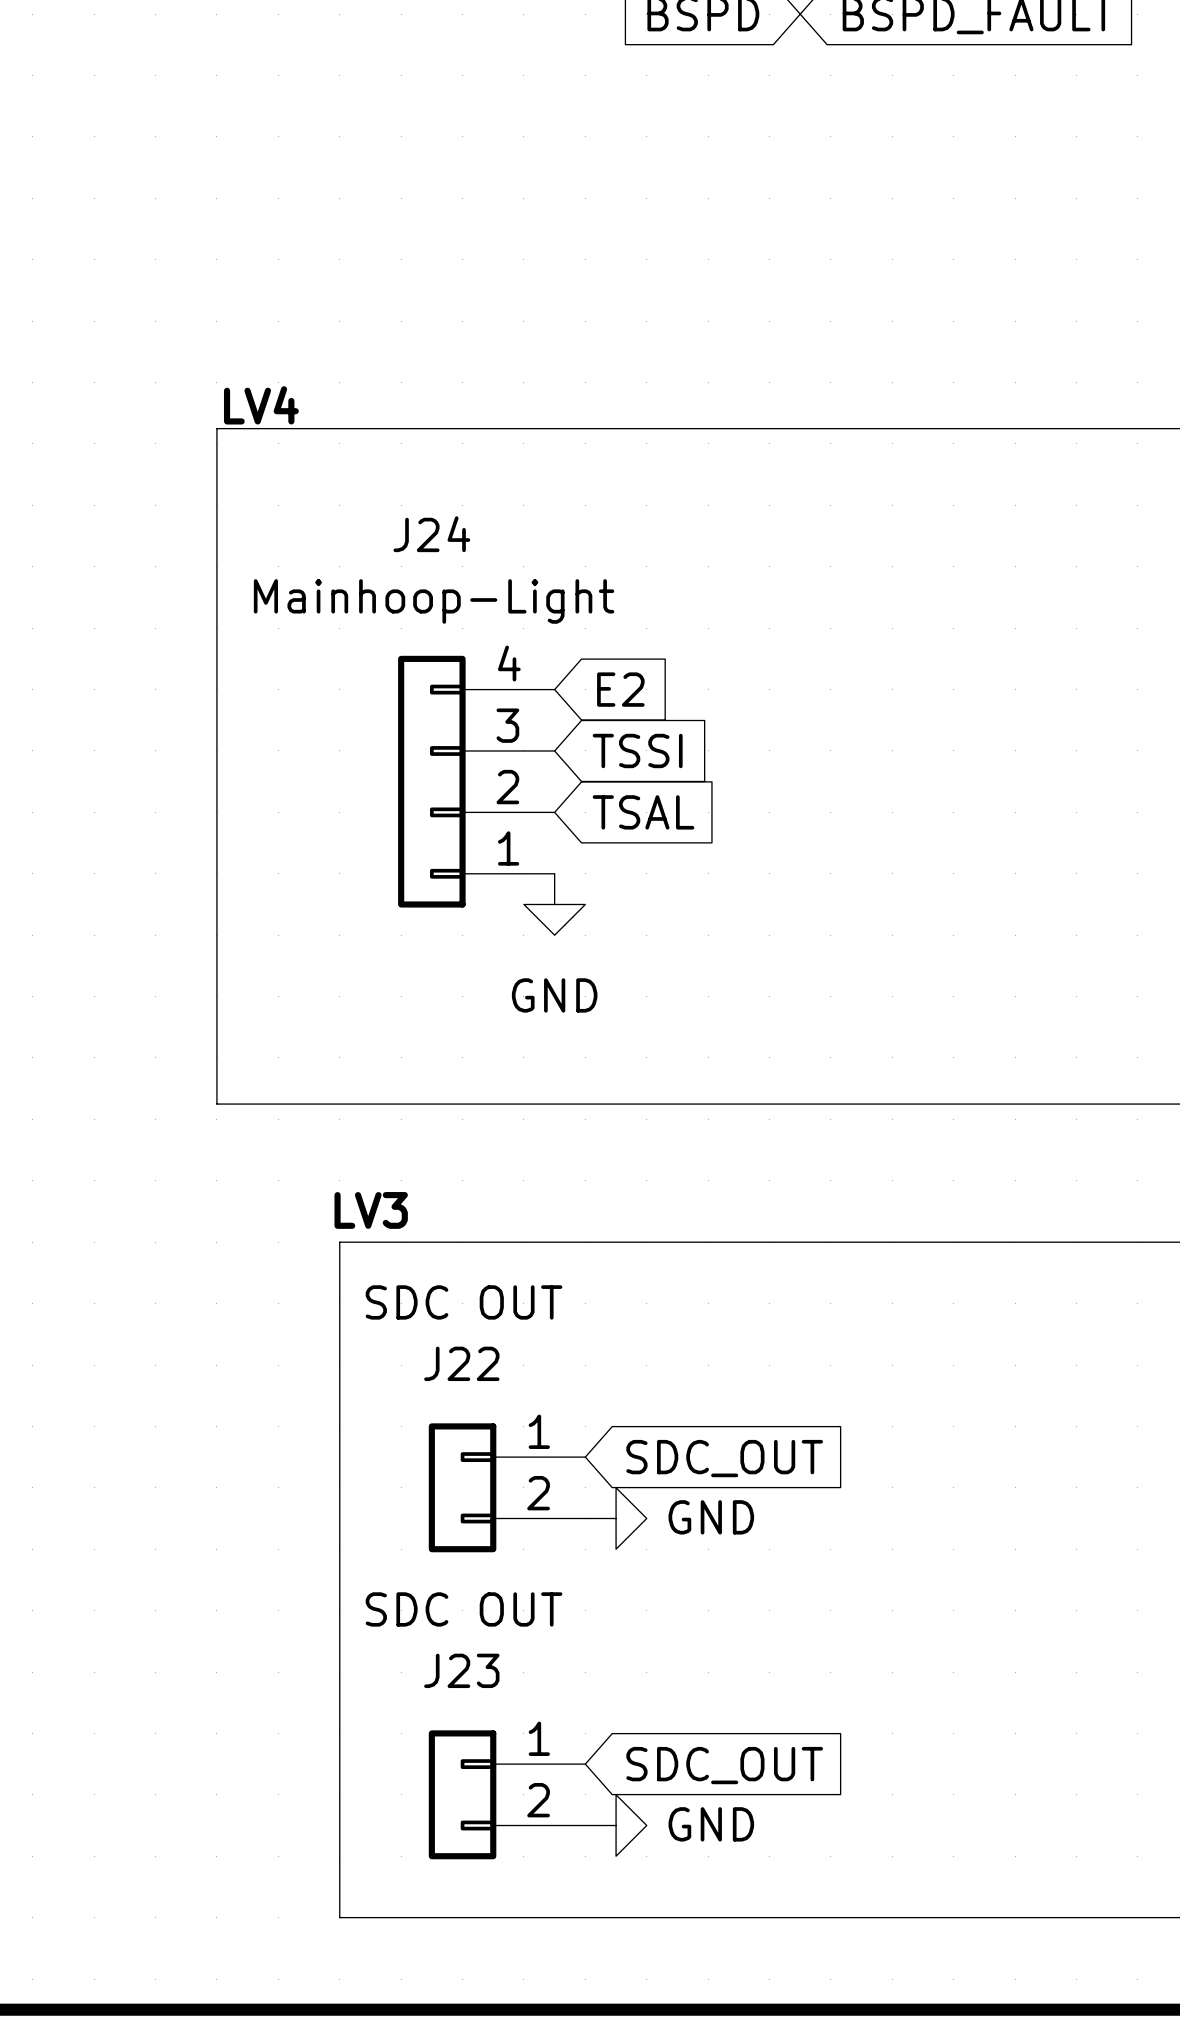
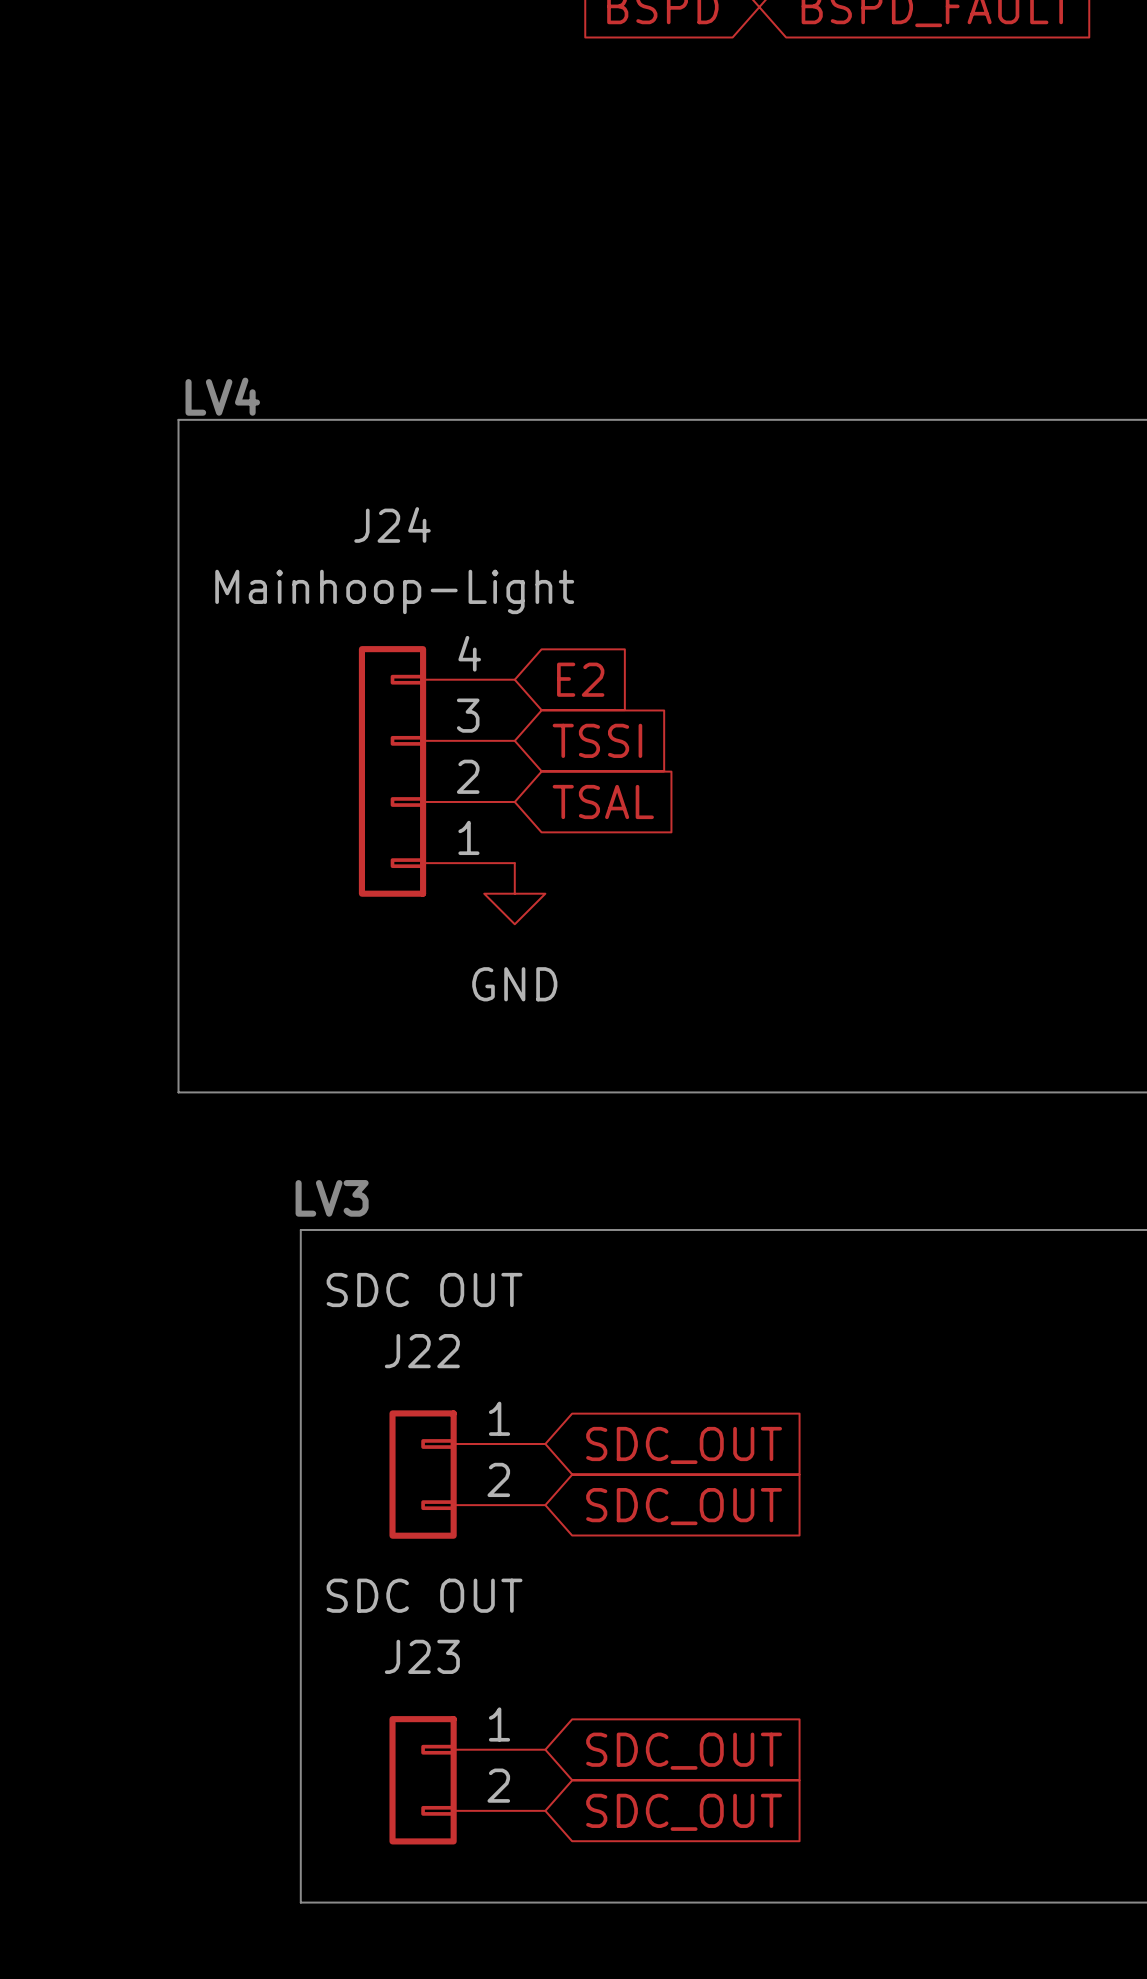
power symbol: GND (616, 1518) -> none
global label: none -> SDC_OUT (684, 1506)
power symbol: GND (616, 1825) -> none
global label: none -> SDC_OUT (684, 1812)

